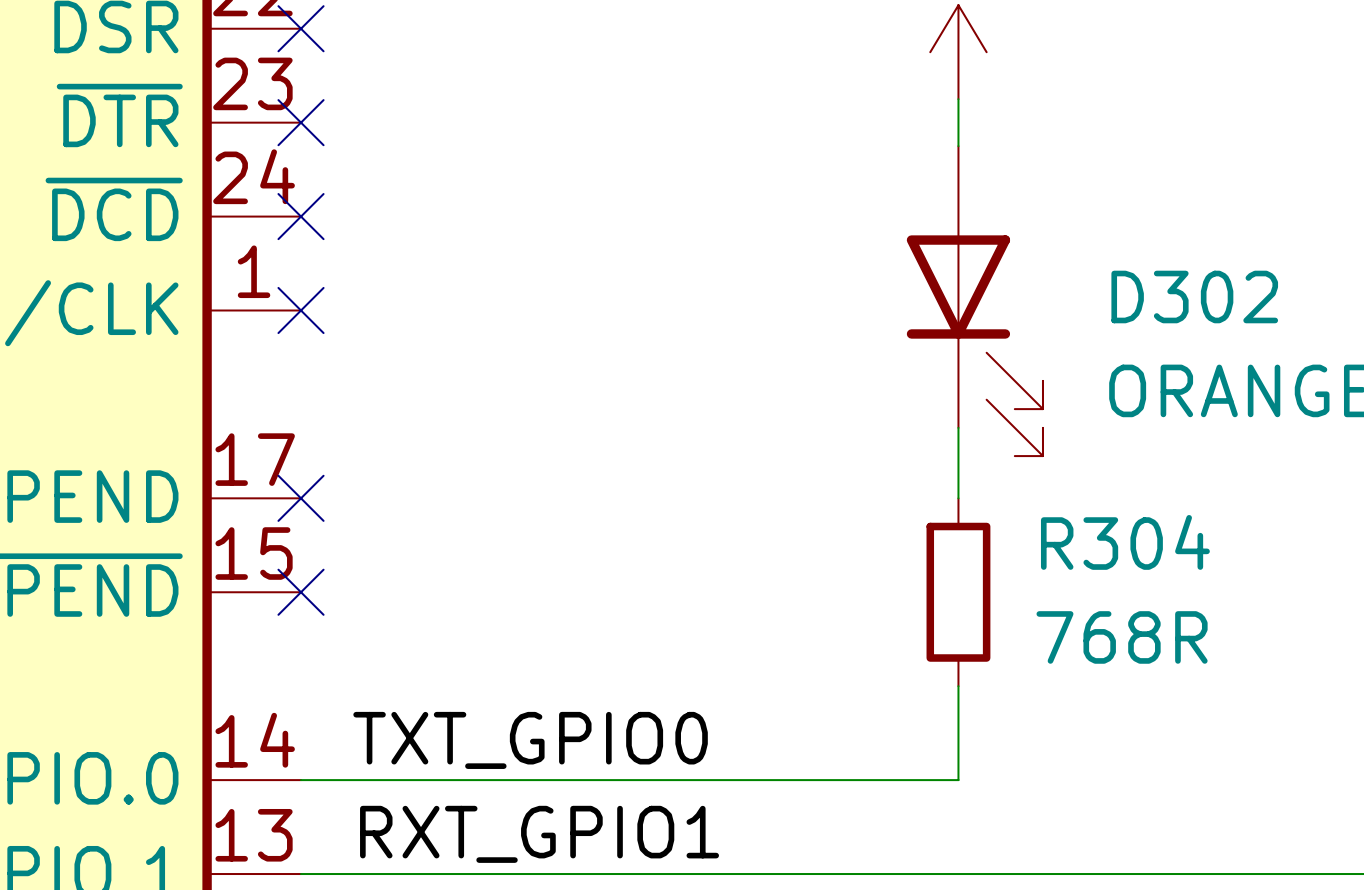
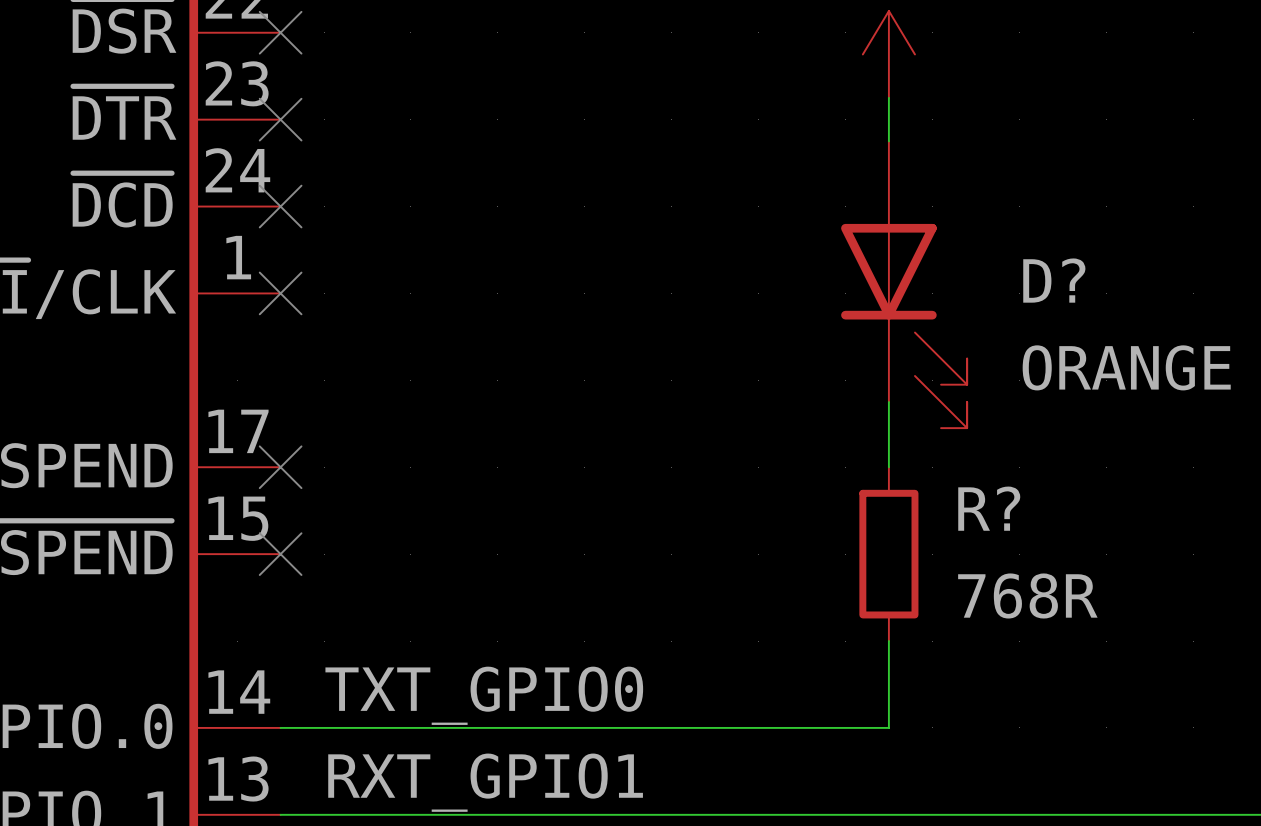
D302 name: D302 (1194, 296) -> D? (1054, 280)
R304 name: R304 (1125, 542) -> R? (989, 508)

